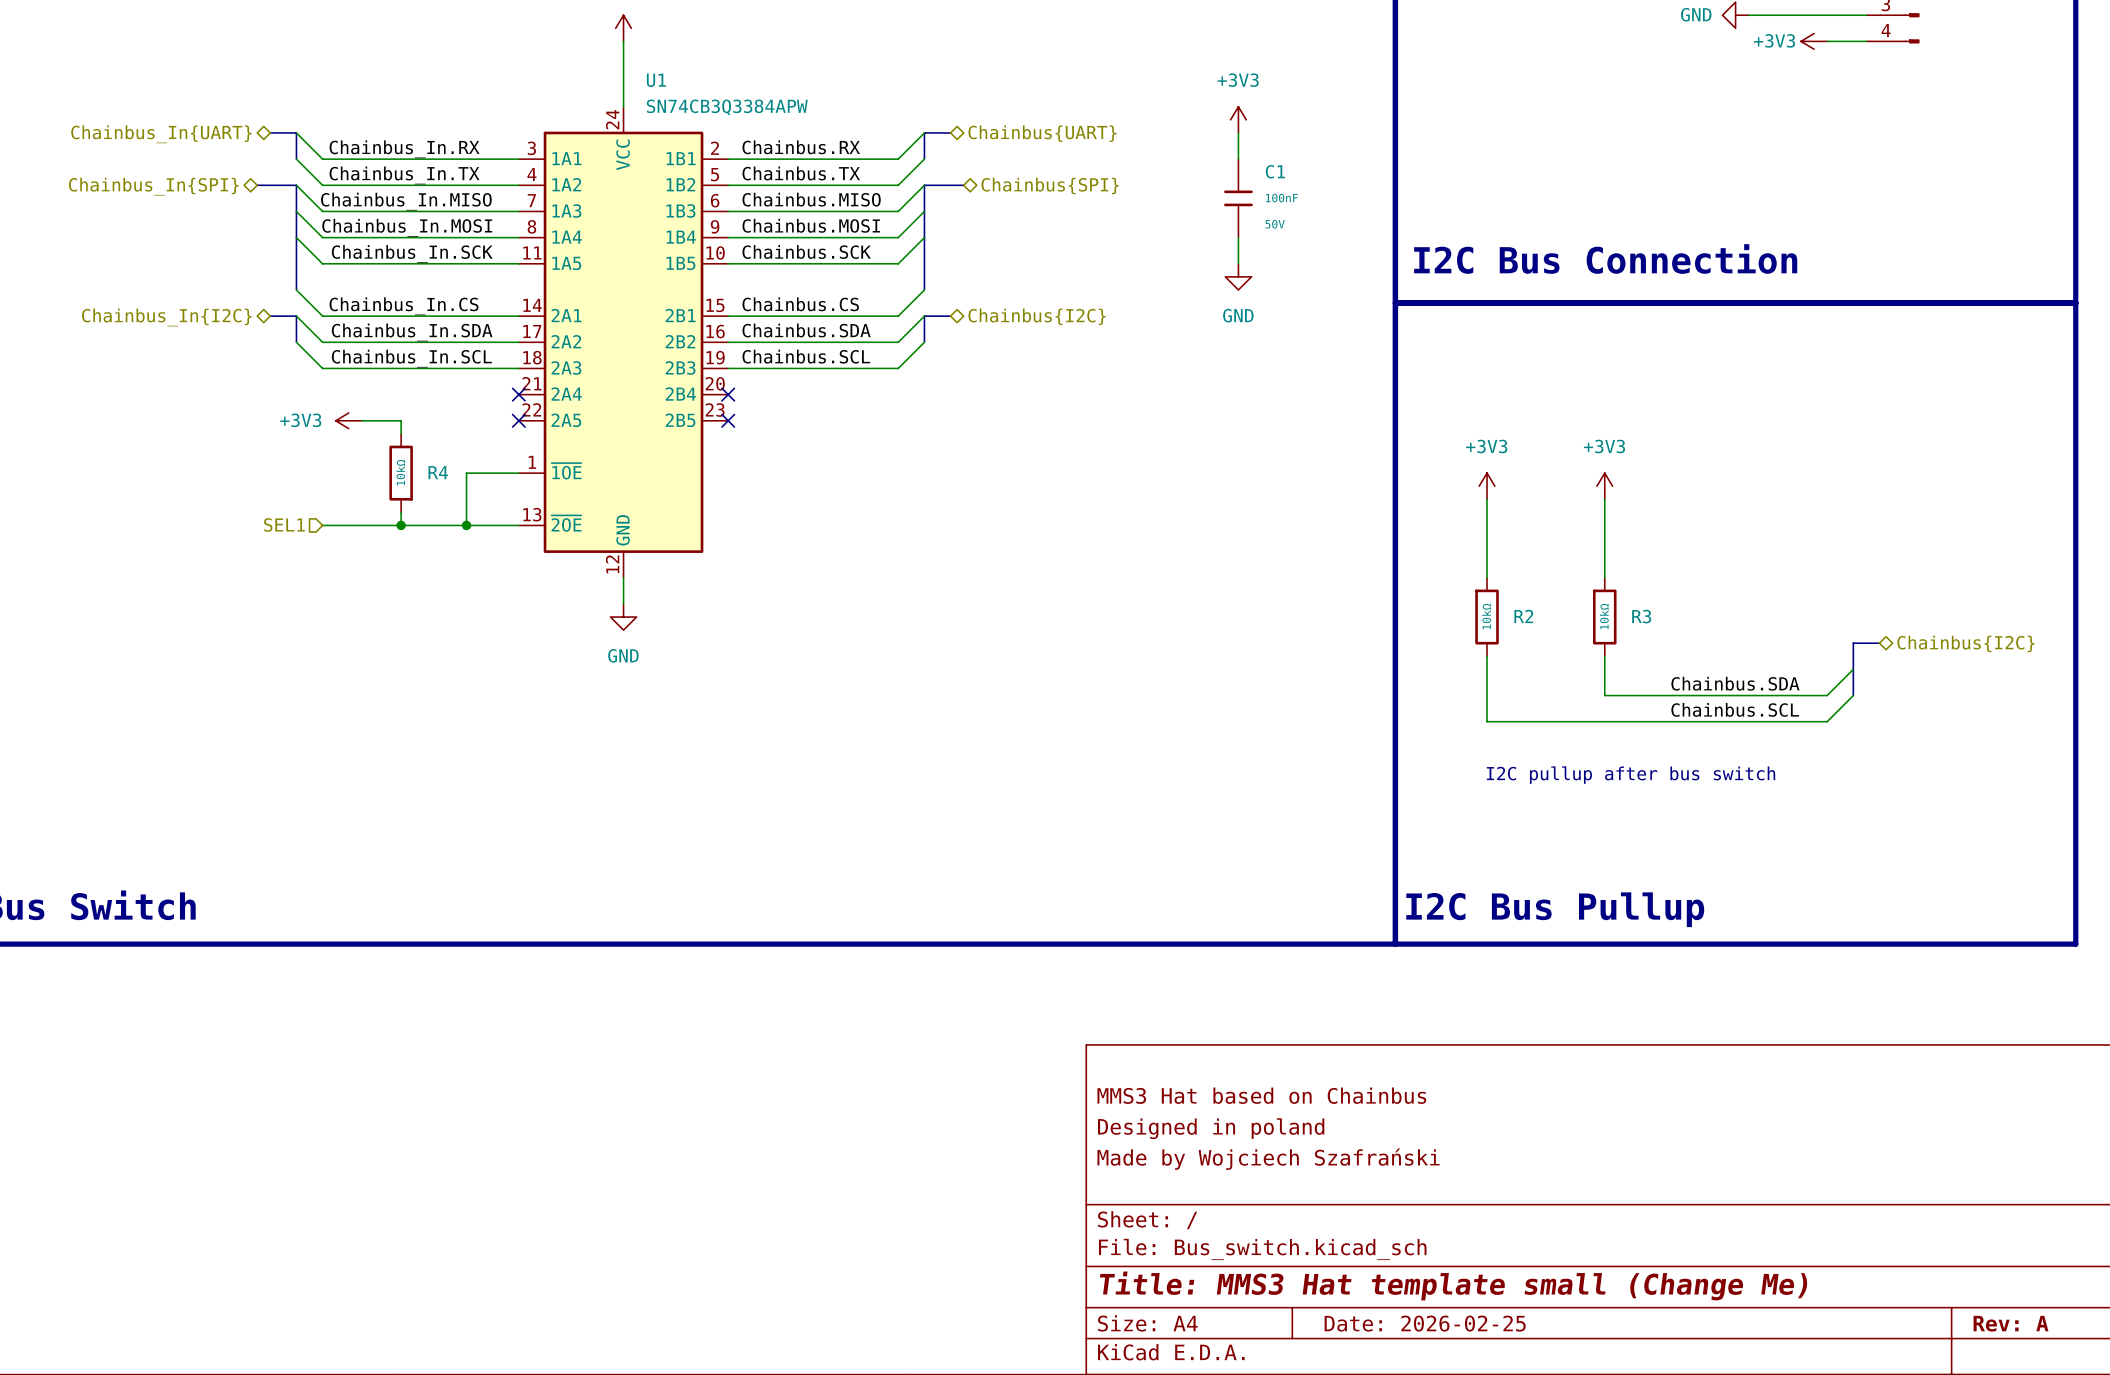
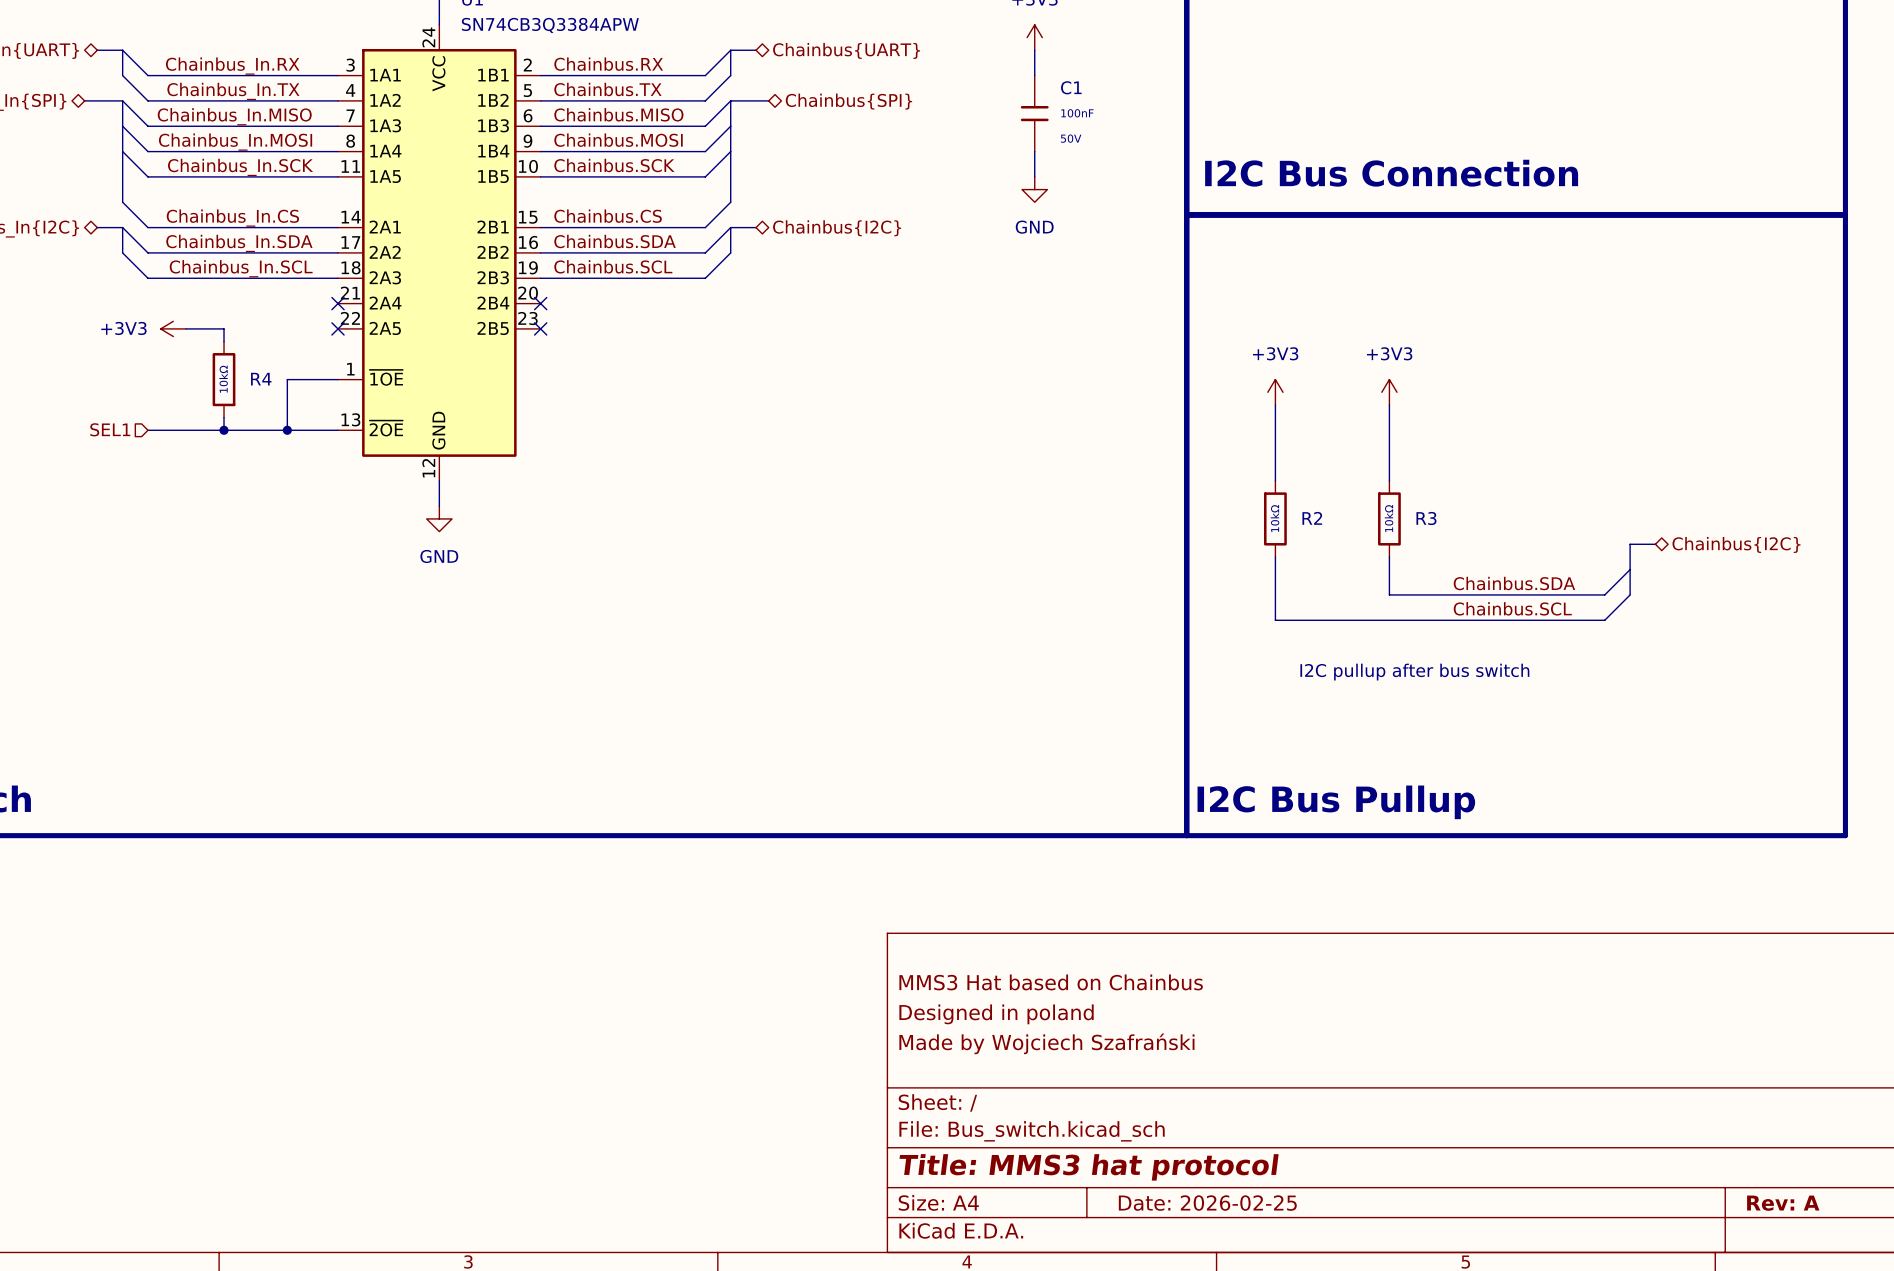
title block: Title: MMS3 Hat template small (Change Me) (1453, 1285) -> Title: MMS3 hat protocol (1089, 1167)

